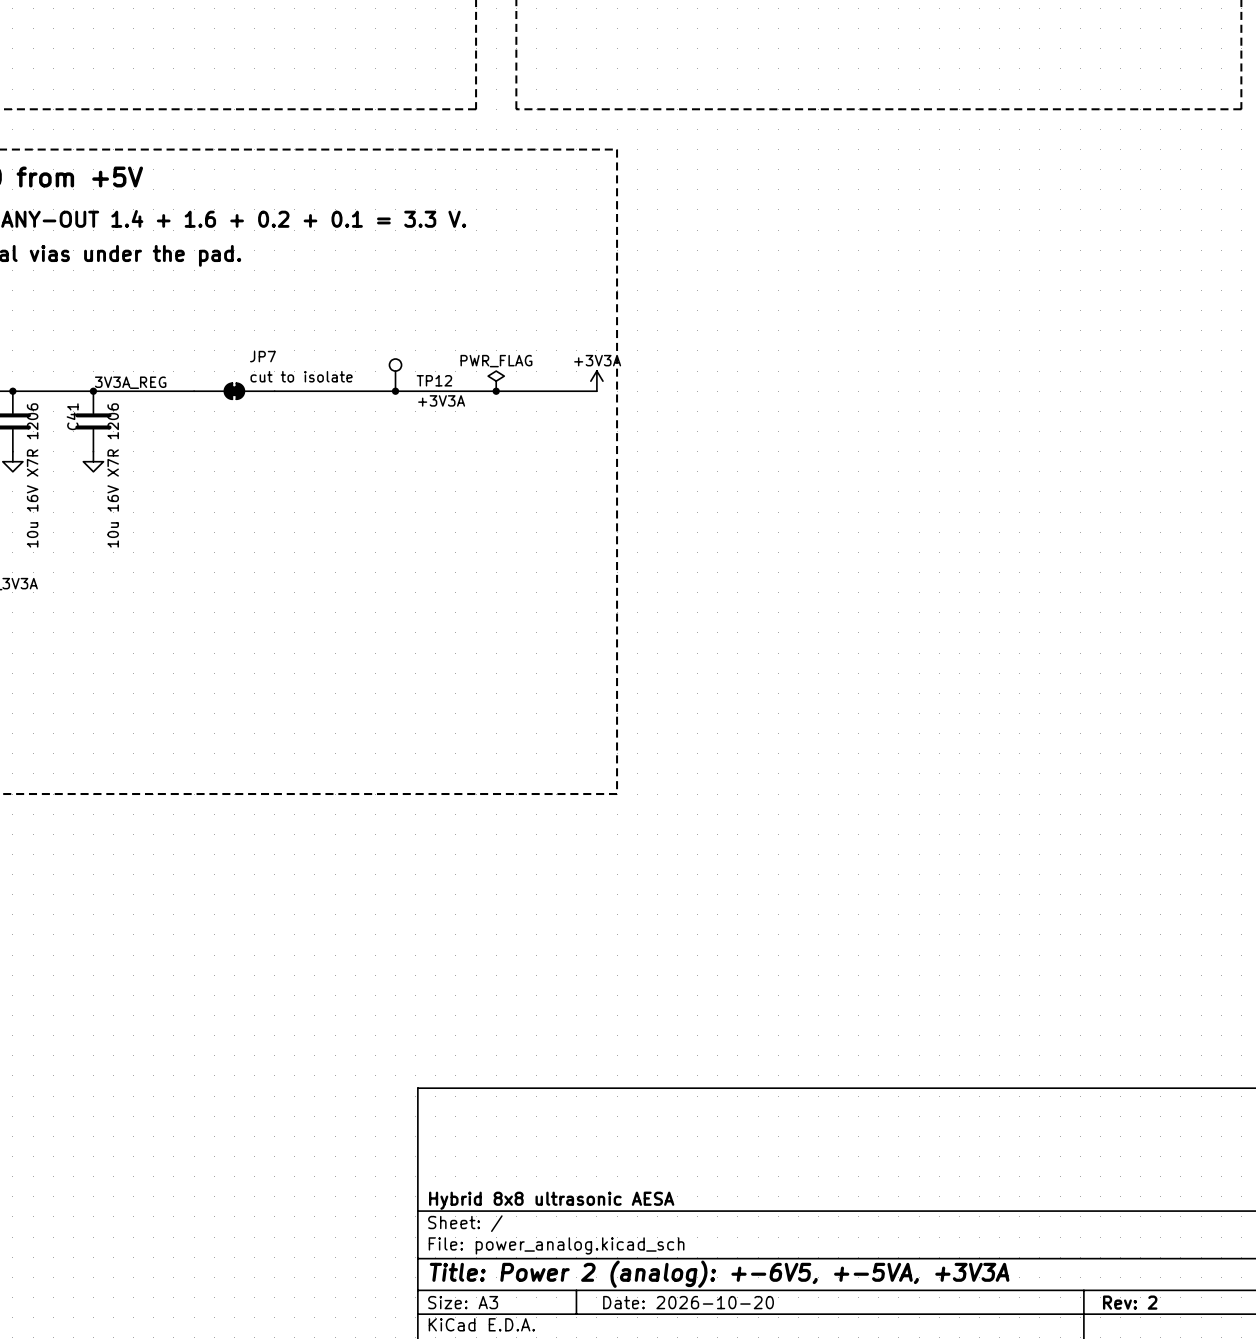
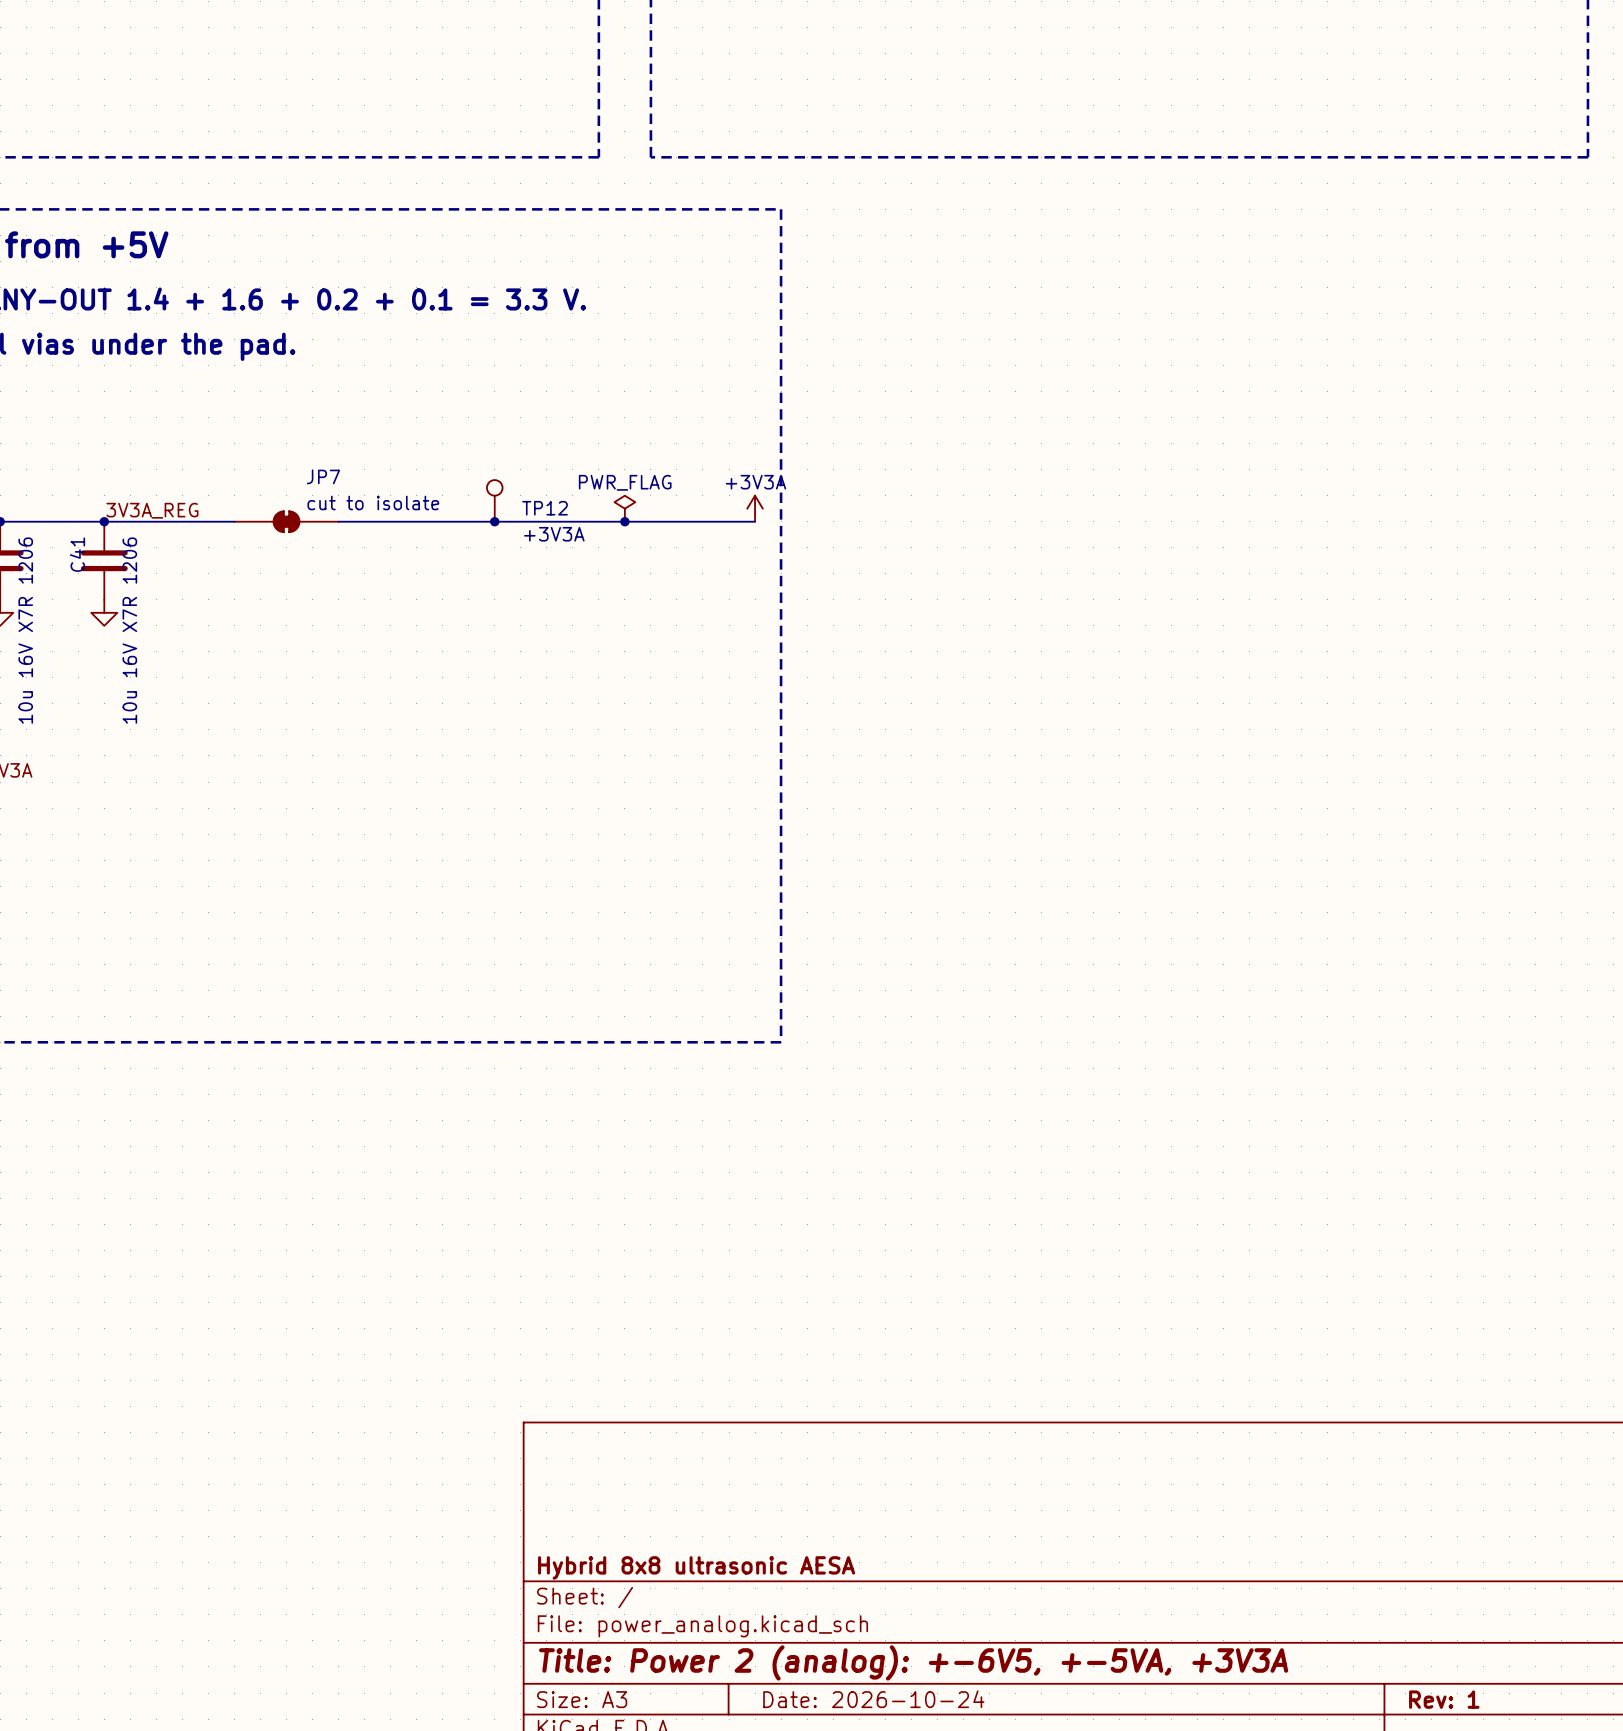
title block: Date: 2026-10-20 (688, 1302) -> Date: 2026-10-24 (873, 1699)
title block: Rev: 2 (1130, 1302) -> Rev: 1 (1444, 1699)

